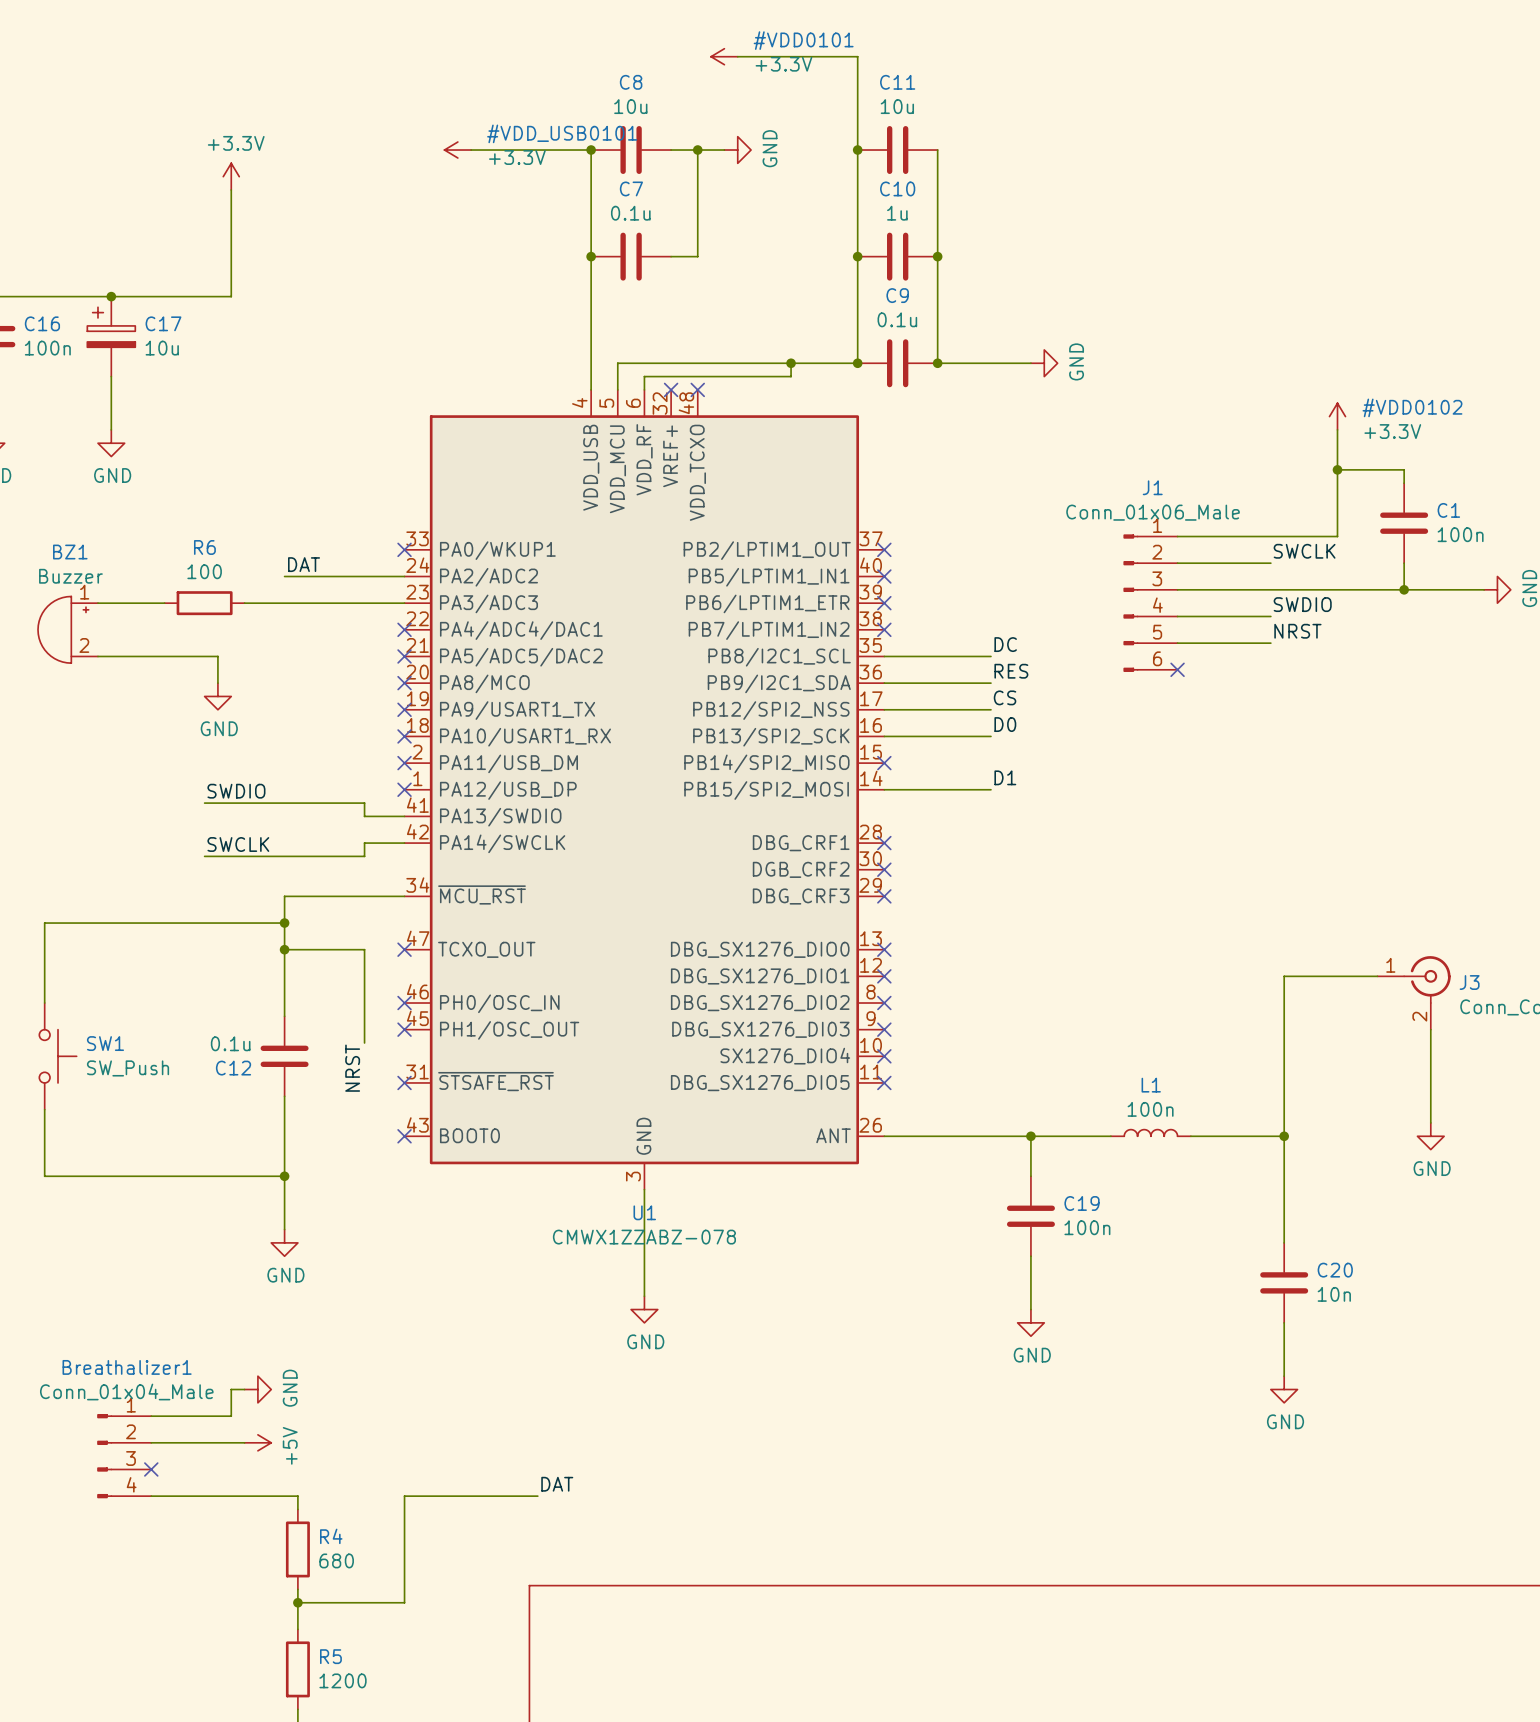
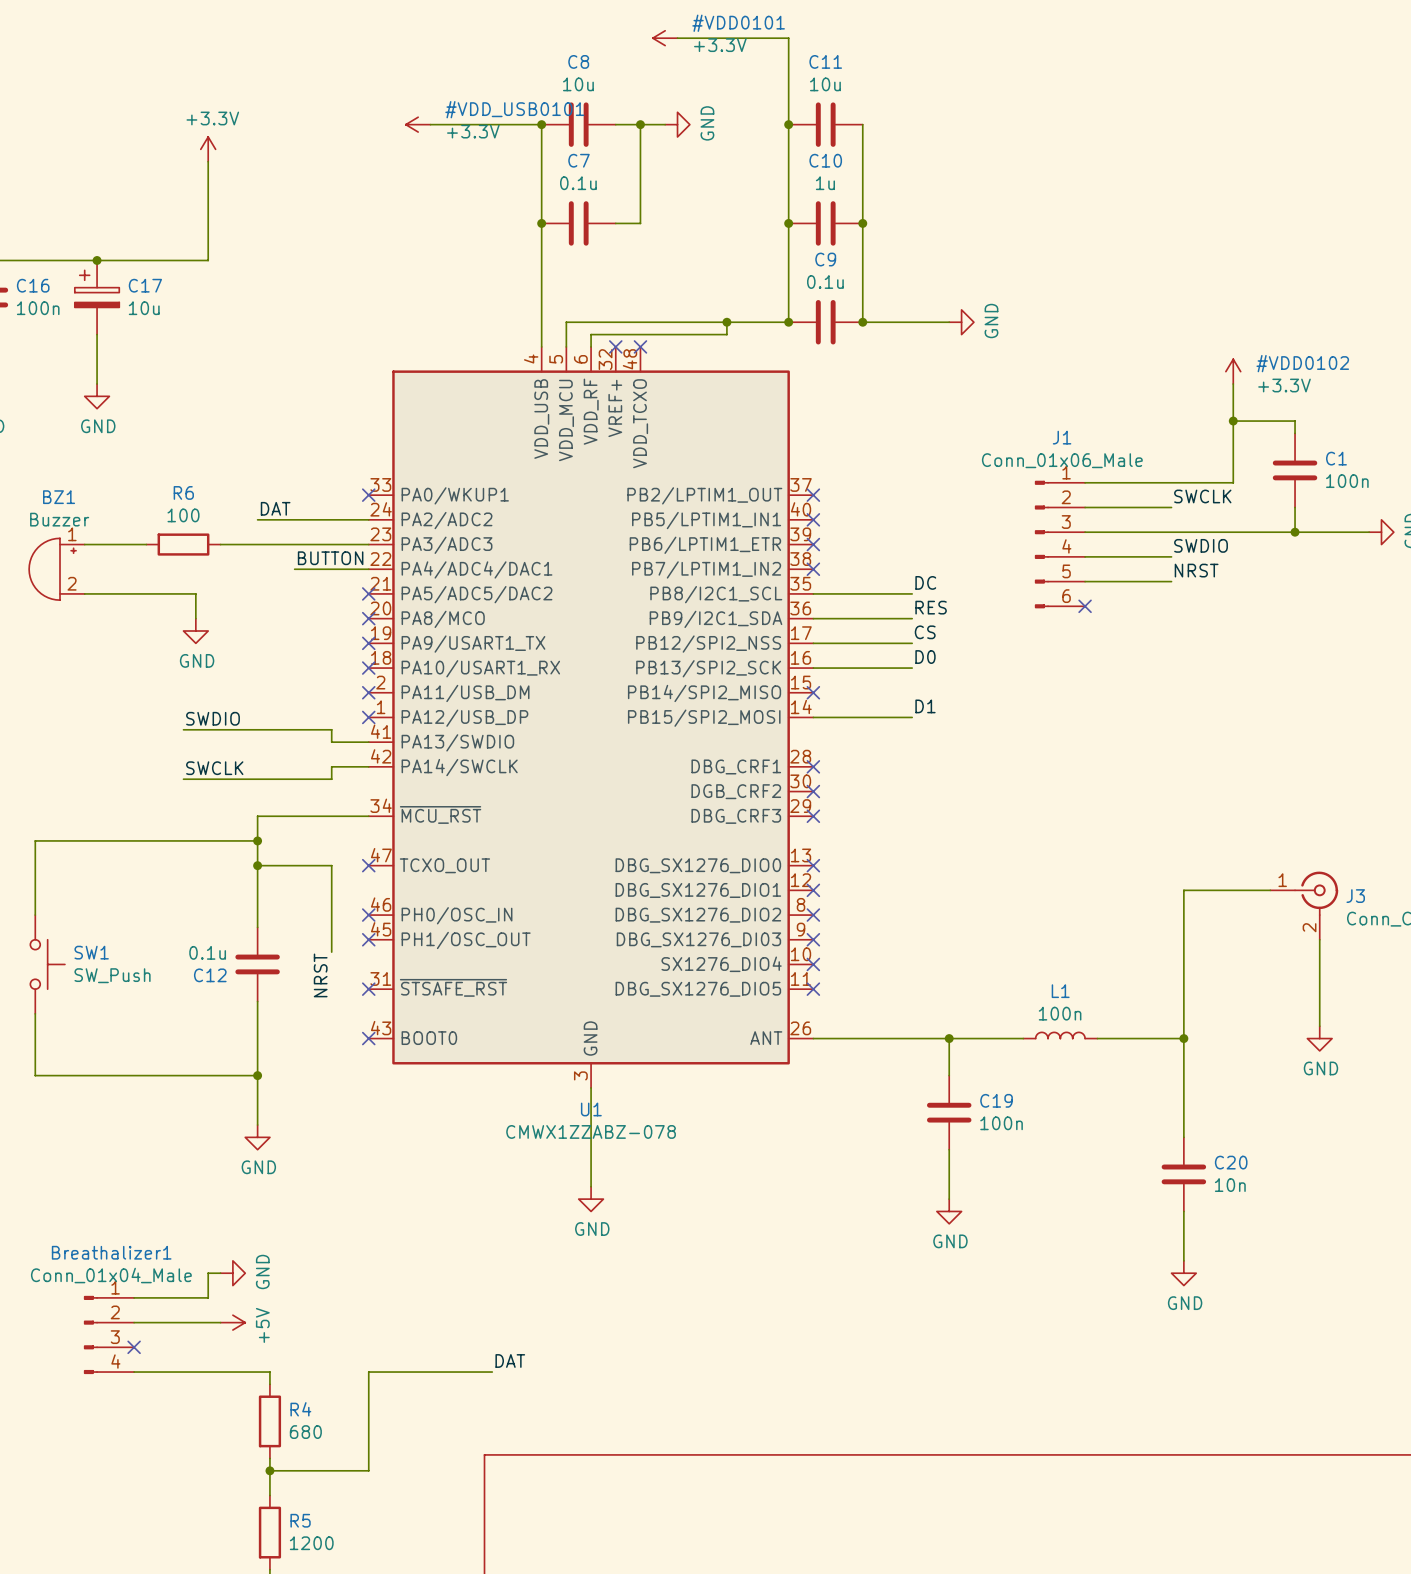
label: none -> BUTTON (330, 558)
wire: none -> (294, 569) (368, 569)
no-connect mark: (404, 629) -> none

